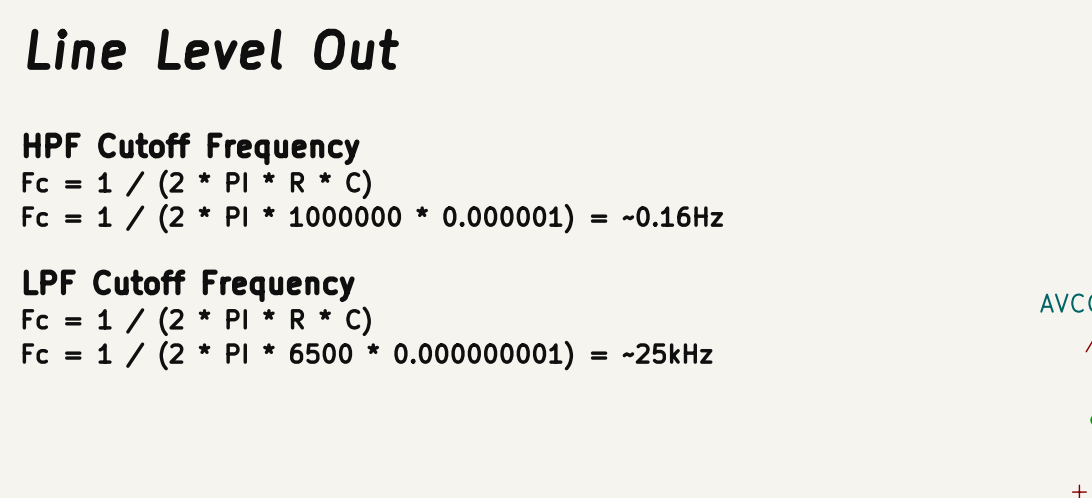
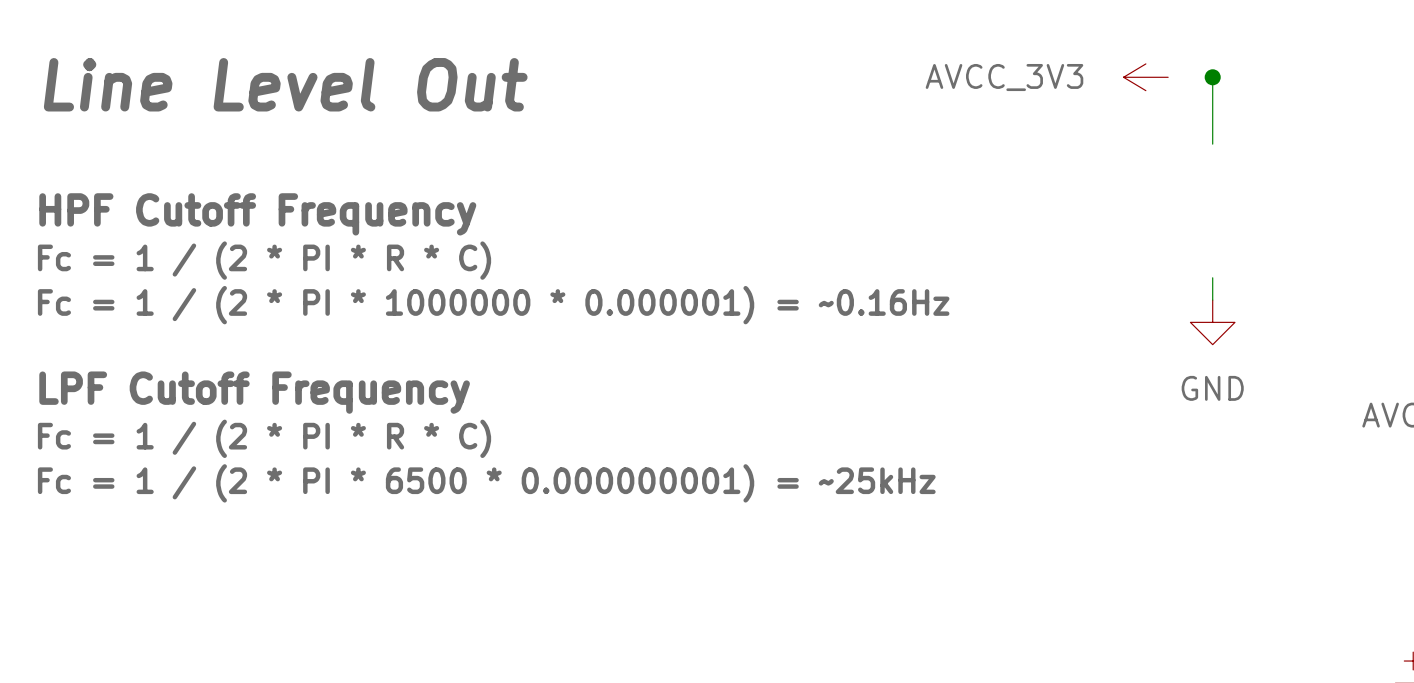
power symbol: none -> AVCC_3V3 (1145, 77)
wire: none -> (1212, 77) (1212, 144)
junction: none -> (1212, 77)
wire: none -> (1212, 277) (1212, 300)
power symbol: none -> GND (1212, 322)

